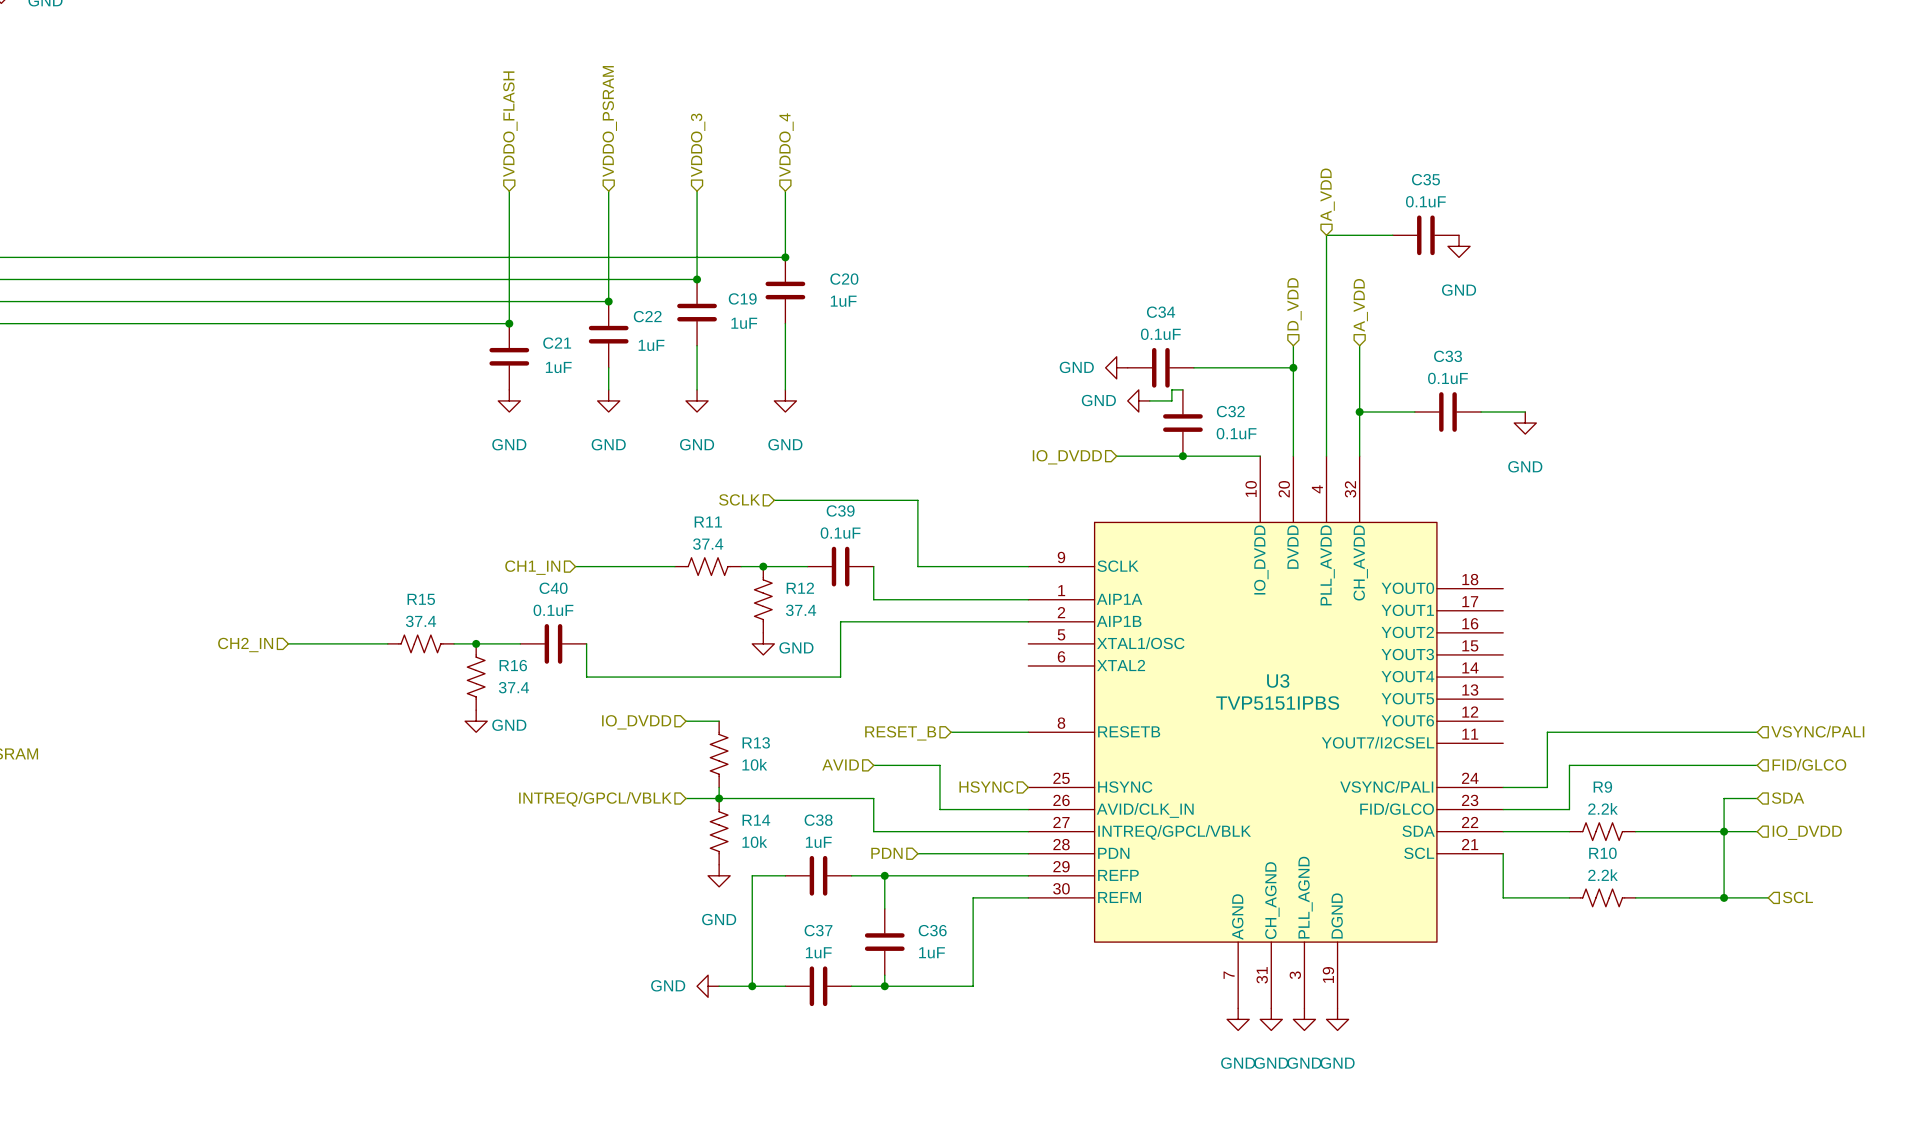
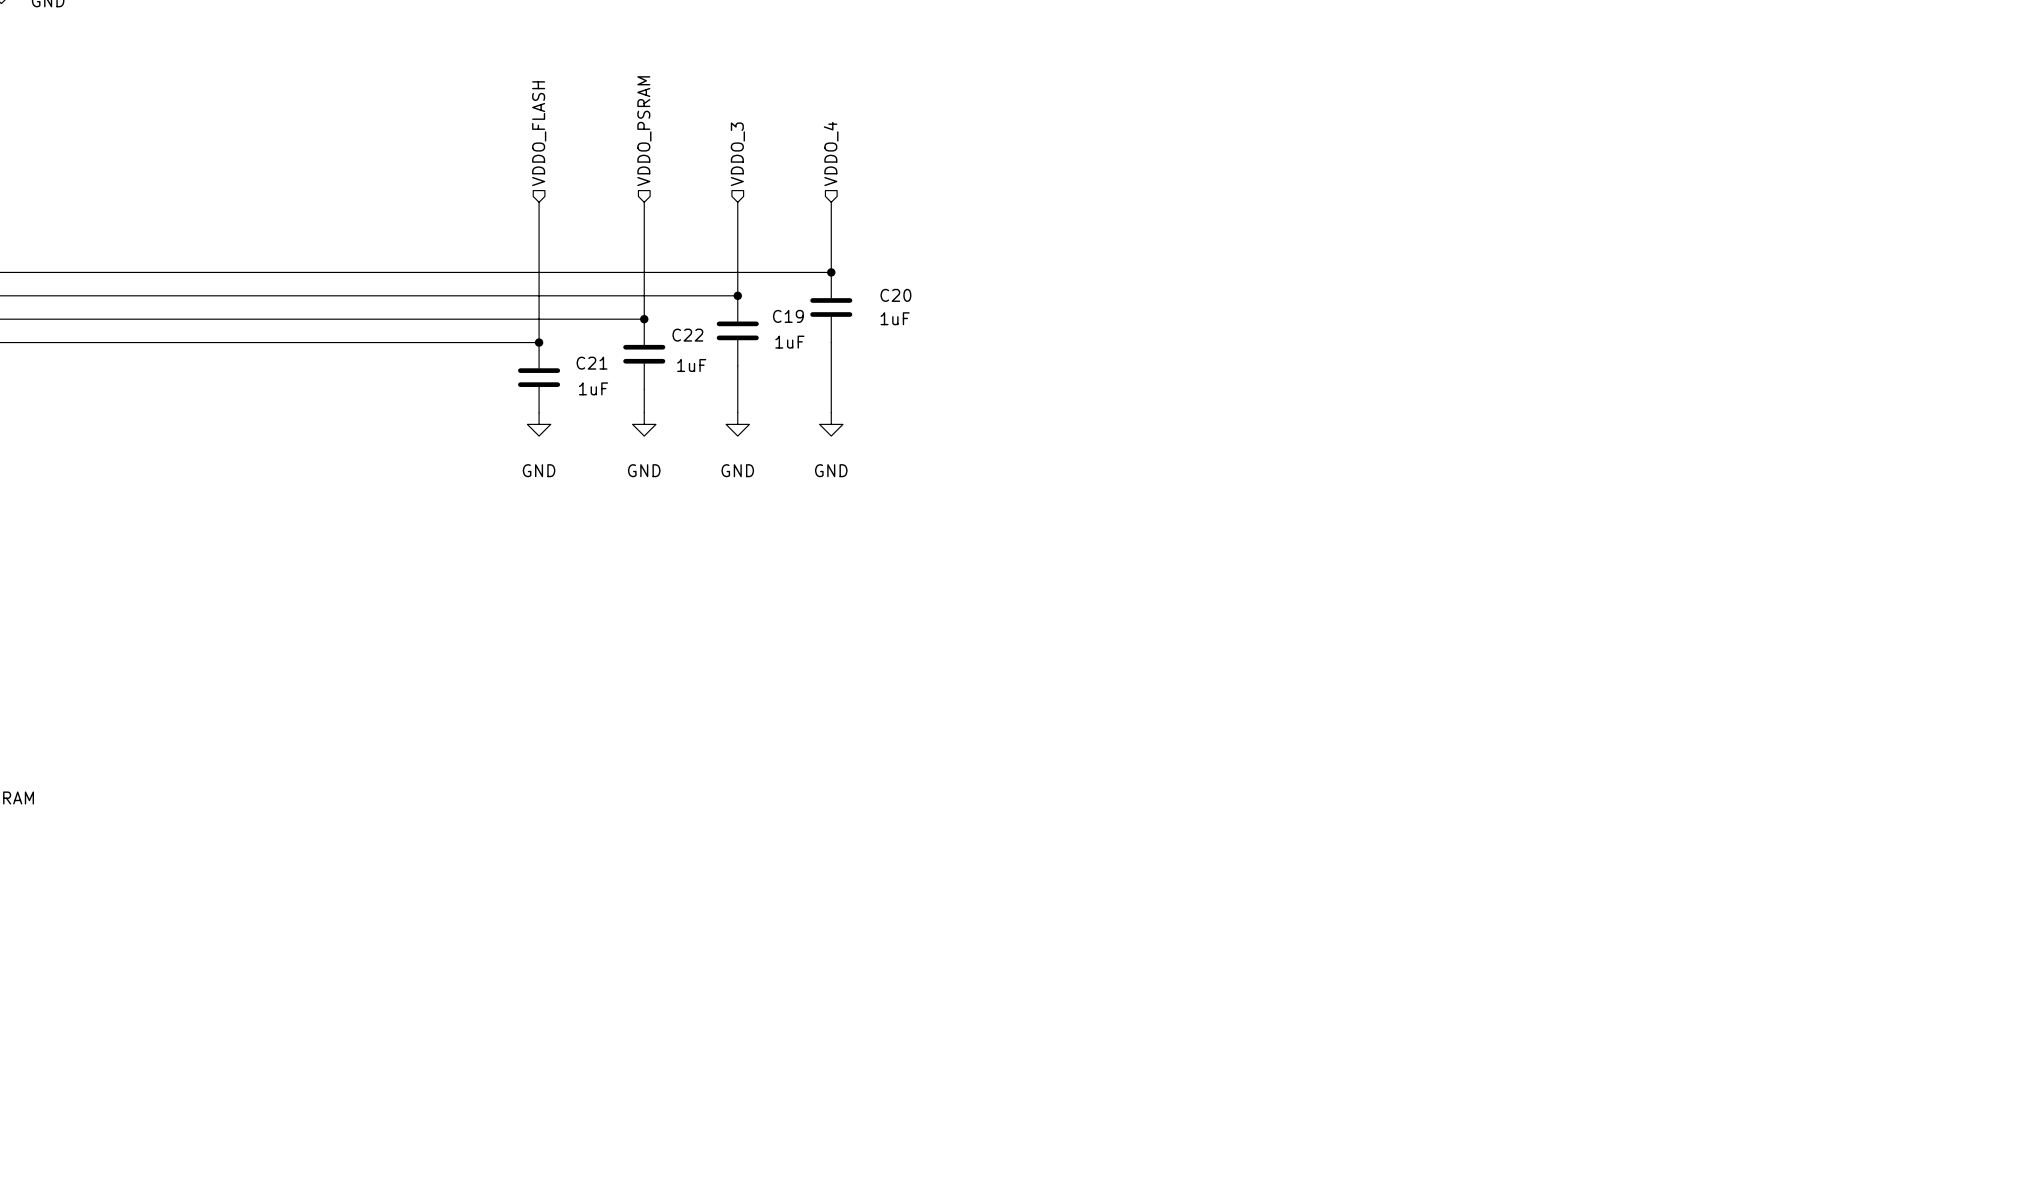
hierarchical label: A_VDD (1327, 194) -> none
wire: (1392, 235) (1326, 235) (1326, 456) -> none
C35: 0.1uF (1425, 235) -> none
power symbol: GND (1459, 246) -> none
hierarchical label: D_VDD (1294, 304) -> none
hierarchical label: A_VDD (1360, 305) -> none
wire: (1293, 345) (1293, 456) -> none
wire: (1359, 345) (1359, 456) -> none
power symbol: GND (1116, 367) -> none
C34: 0.1uF (1160, 367) -> none
wire: (1193, 367) (1293, 367) -> none
junction: (1293, 367) -> none
wire: (1182, 389) (1171, 389) (1171, 400) (1149, 400) -> none
power symbol: GND (1138, 400) -> none
wire: (1359, 412) (1414, 412) -> none
junction: (1359, 412) -> none
C33: 0.1uF (1447, 412) -> none
wire: (1481, 412) (1525, 412) -> none
C32: 0.1uF (1182, 423) -> none
power symbol: GND (1525, 423) -> none
wire: (1116, 456) (1260, 456) -> none
junction: (1182, 456) -> none
hierarchical label: IO_DVDD (1067, 457) -> none
hierarchical label: SCLK (739, 499) -> none
wire: (774, 500) (917, 500) (917, 566) (1028, 566) -> none
wire: (575, 566) (674, 566) -> none
R11: 37.4 (708, 566) -> none
wire: (741, 566) (807, 566) -> none
junction: (763, 566) -> none
C39: 0.1uF (840, 566) -> none
wire: (873, 566) (873, 599) (1028, 599) -> none
hierarchical label: CH1_IN (532, 567) -> none
R12: 37.4 (763, 599) -> none
wire: (1028, 621) (840, 621) (840, 677) (586, 677) (586, 643) -> none
wire: (288, 643) (387, 643) -> none
R15: 37.4 (420, 643) -> none
wire: (454, 643) (520, 643) -> none
junction: (476, 643) -> none
C40: 0.1uF (553, 643) -> none
power symbol: GND (763, 643) -> none
hierarchical label: CH2_IN (245, 645) -> none
R16: 37.4 (476, 677) -> none
power symbol: GND (476, 721) -> none
wire: (685, 721) (719, 721) -> none
hierarchical label: IO_DVDD (636, 722) -> none
hierarchical label: VSYNC/PALI (1817, 731) -> none
wire: (951, 732) (1028, 732) -> none
U3: TVP5151IPBS (1265, 732) -> none
wire: (1757, 732) (1547, 732) (1547, 787) (1503, 787) -> none
hierarchical label: RESET_B (900, 733) -> none
R13: 10k (719, 754) -> none
hierarchical label: AVID (840, 764) -> none
hierarchical label: FID/GLCO (1809, 764) -> none
wire: (873, 765) (939, 765) (939, 809) (1028, 809) -> none
wire: (1757, 765) (1569, 765) (1569, 809) (1503, 809) -> none
wire: (719, 787) (719, 798) -> none
hierarchical label: HSYNC (986, 787) -> none
wire: (685, 798) (873, 798) (873, 831) (1028, 831) -> none
junction: (719, 798) -> none
wire: (1757, 798) (1724, 798) (1724, 897) -> none
hierarchical label: SDA (1788, 798) -> none
hierarchical label: INTREQ/GPCL/VBLK (595, 799) -> none
R14: 10k (719, 831) -> none
wire: (1503, 831) (1569, 831) -> none
R9: 2.2k (1602, 831) -> none
wire: (1635, 831) (1757, 831) -> none
junction: (1724, 831) -> none
hierarchical label: IO_DVDD (1807, 832) -> none
hierarchical label: PDN (886, 853) -> none
wire: (917, 853) (1028, 853) -> none
wire: (1503, 853) (1503, 897) (1569, 897) -> none
power symbol: GND (719, 875) -> none
wire: (785, 875) (752, 875) (752, 986) -> none
C38: 1uF (818, 875) -> none
wire: (851, 875) (1028, 875) -> none
wire: (884, 875) (884, 908) -> none
junction: (884, 875) -> none
wire: (1028, 897) (973, 897) (973, 986) (851, 986) -> none
R10: 2.2k (1602, 897) -> none
wire: (1635, 897) (1768, 897) -> none
junction: (1724, 897) -> none
hierarchical label: SCL (1797, 897) -> none
C36: 1uF (884, 942) -> none
wire: (884, 975) (884, 986) -> none
power symbol: GND (708, 986) -> none
wire: (719, 986) (785, 986) -> none
junction: (752, 986) -> none
C37: 1uF (818, 986) -> none
junction: (884, 986) -> none
power symbol: GND (1238, 1019) -> none
power symbol: GND (1271, 1019) -> none
power symbol: GND (1304, 1019) -> none
power symbol: GND (1337, 1019) -> none

